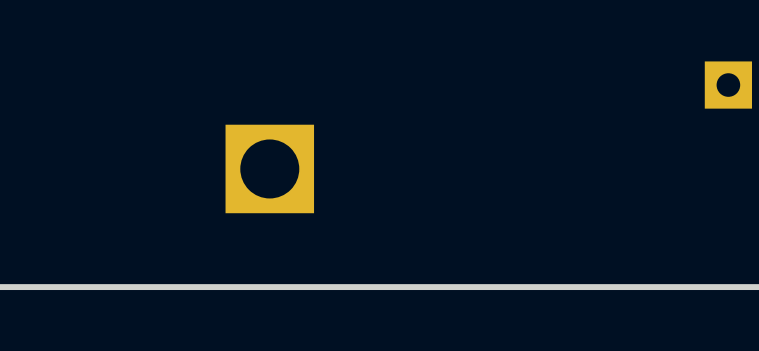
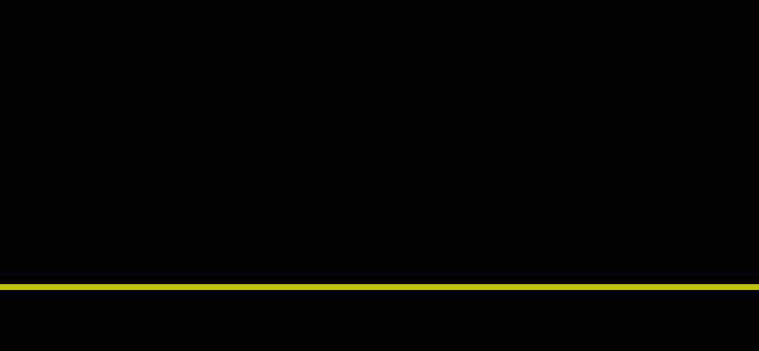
part: (728, 85) -> none
part: (269, 168) -> none

